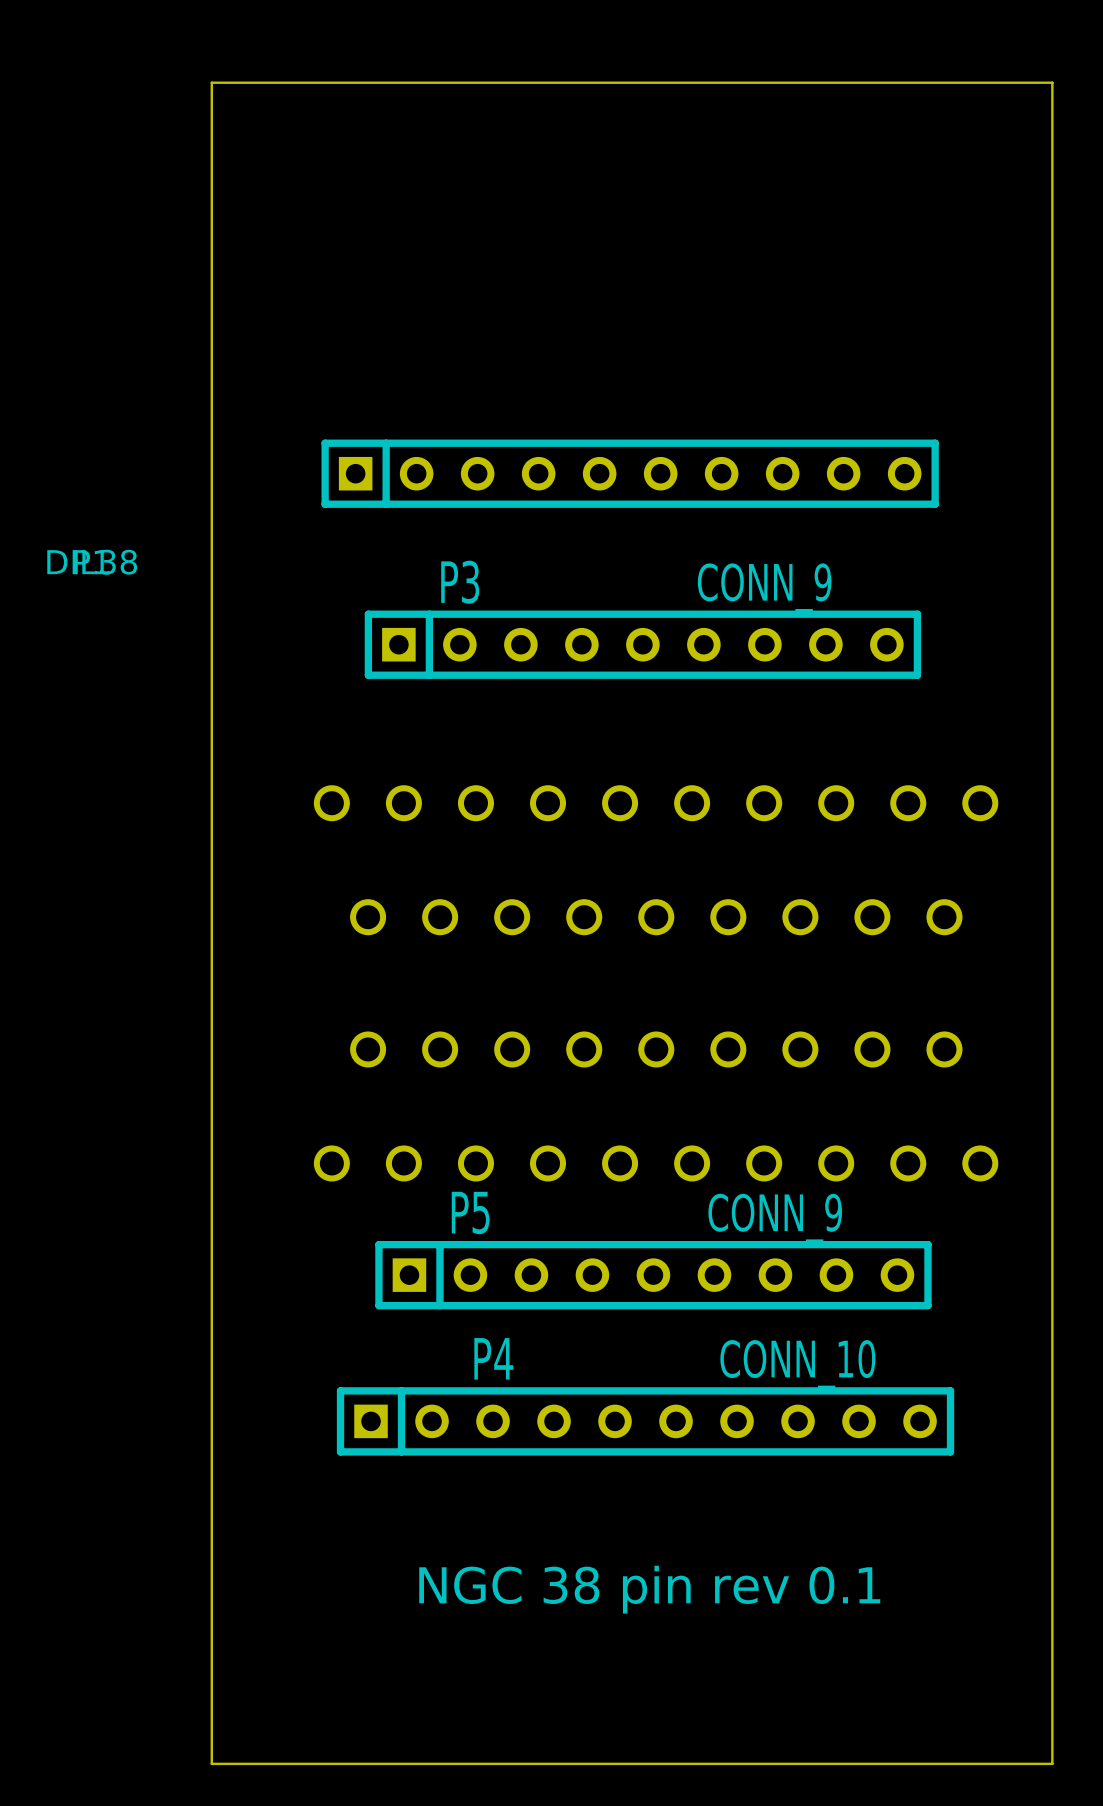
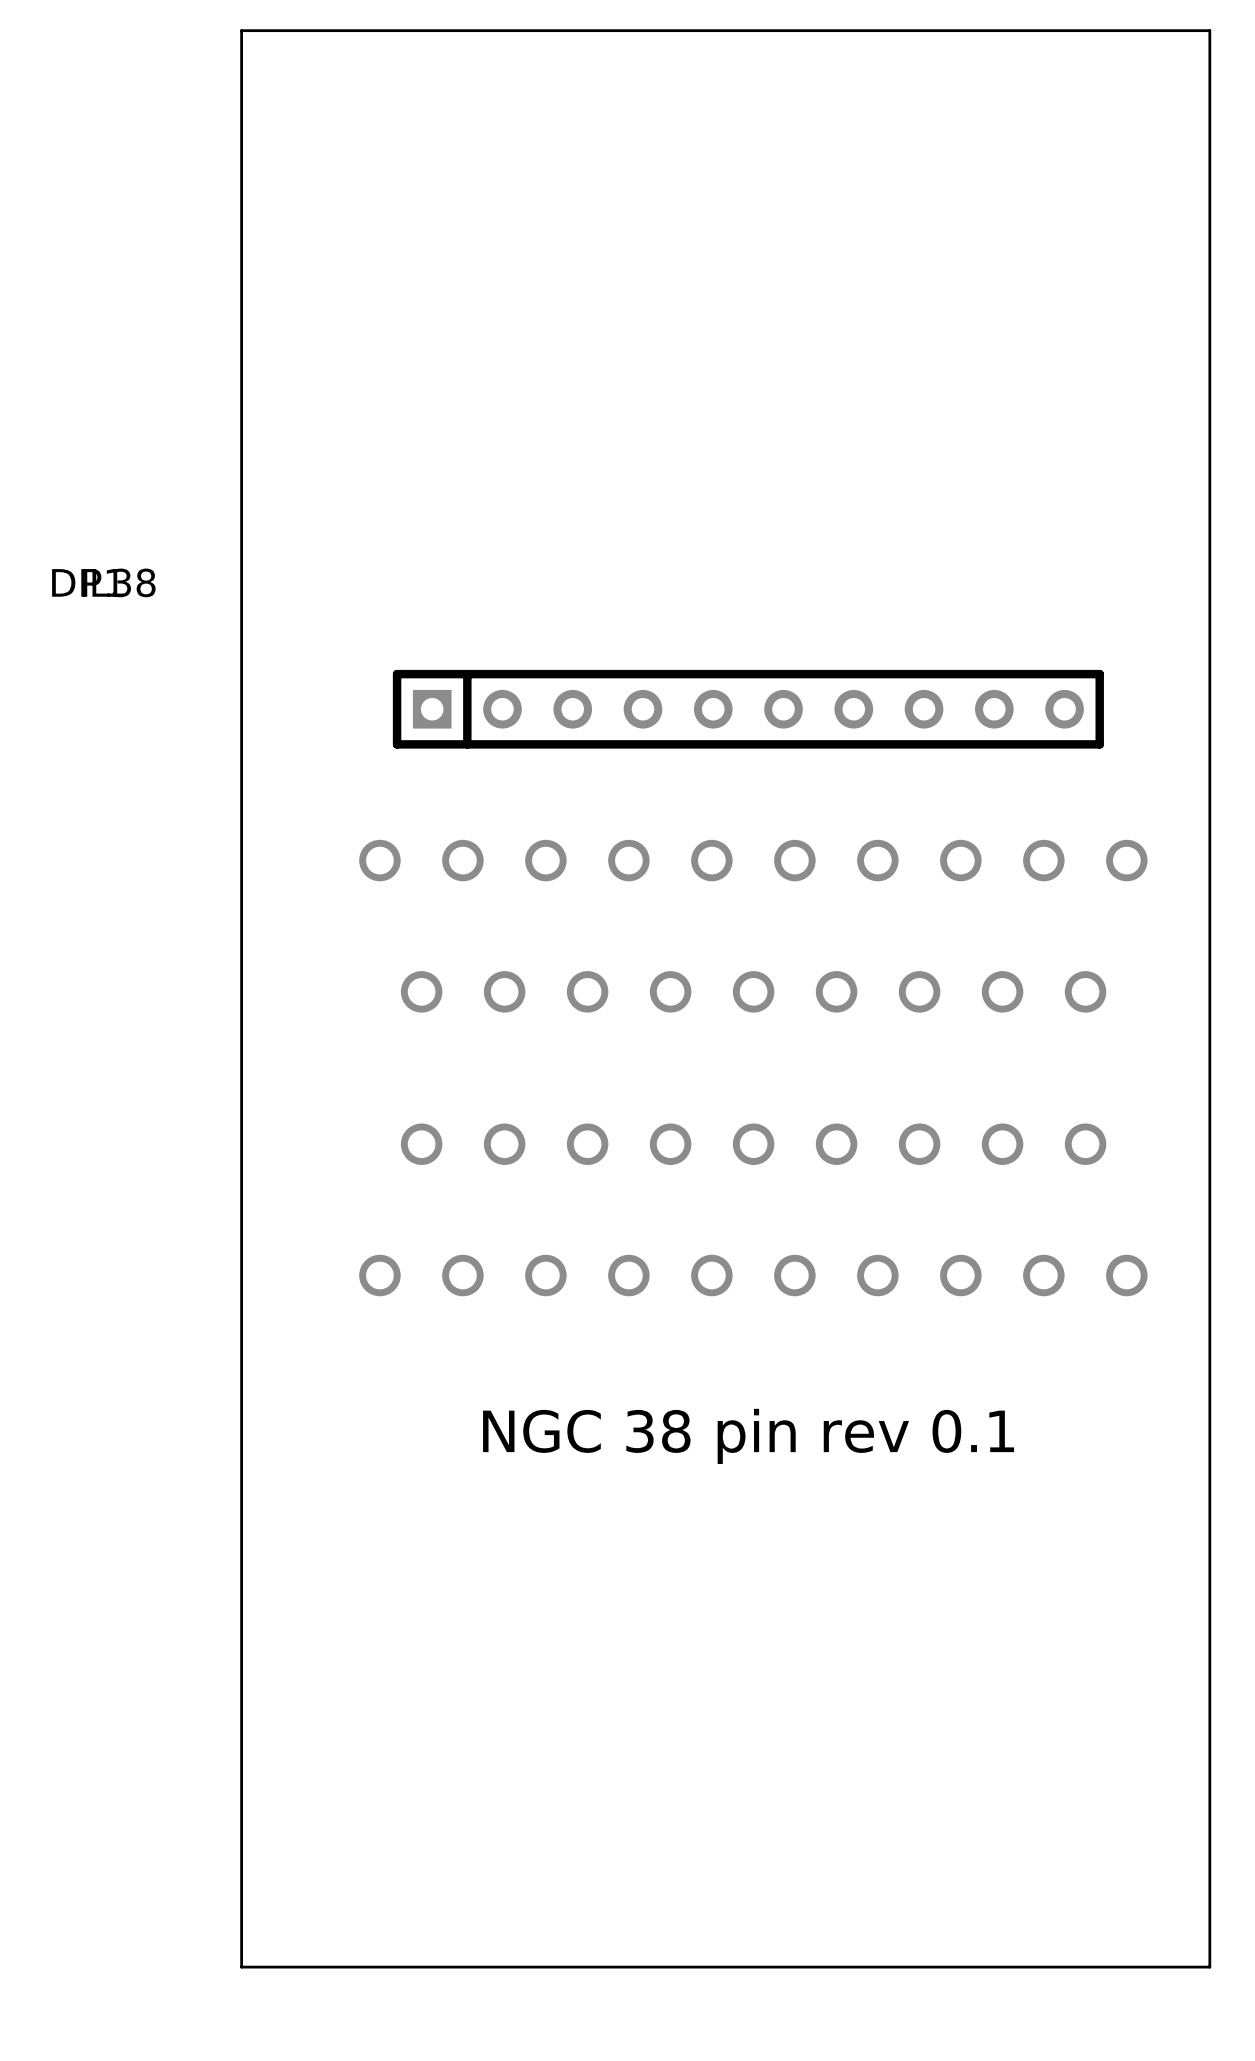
part position: (630, 473) -> (748, 709)
P3: CONN_9 (642, 644) -> none
P5: CONN_9 (653, 1275) -> none
P4: CONN_10 (645, 1421) -> none
text position: NGC 38 pin rev 0.1 (649, 1589) -> NGC 38 pin rev 0.1 (748, 1436)

